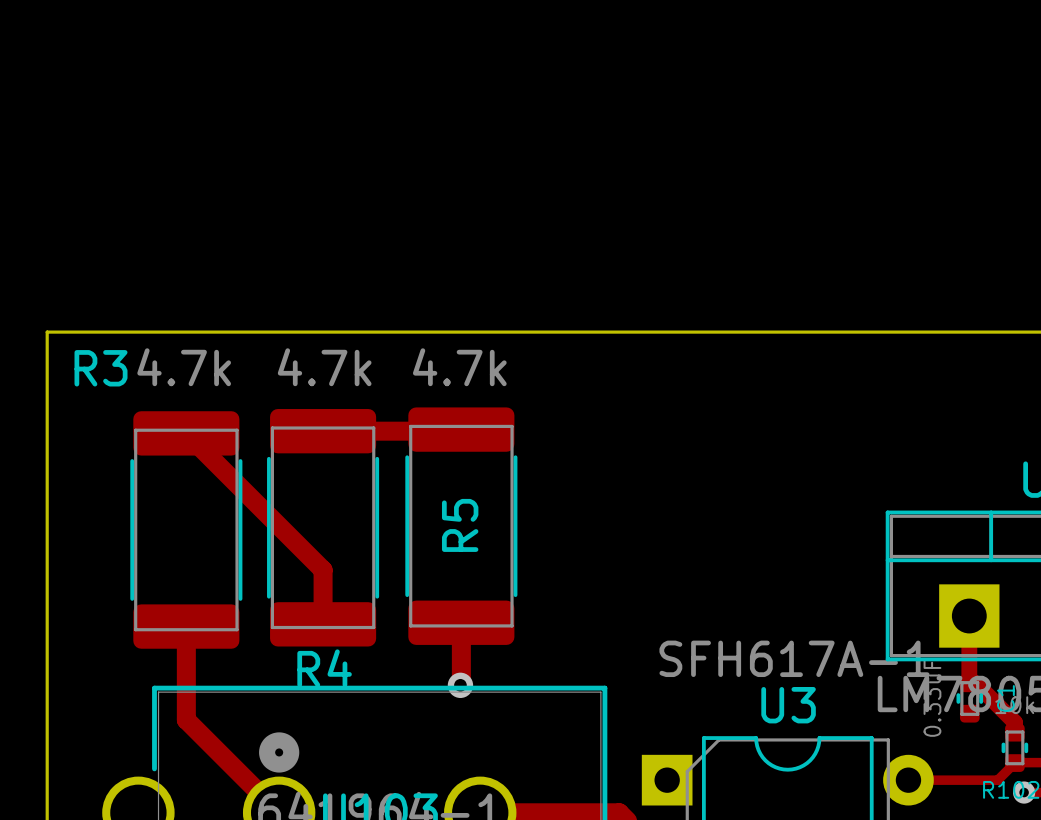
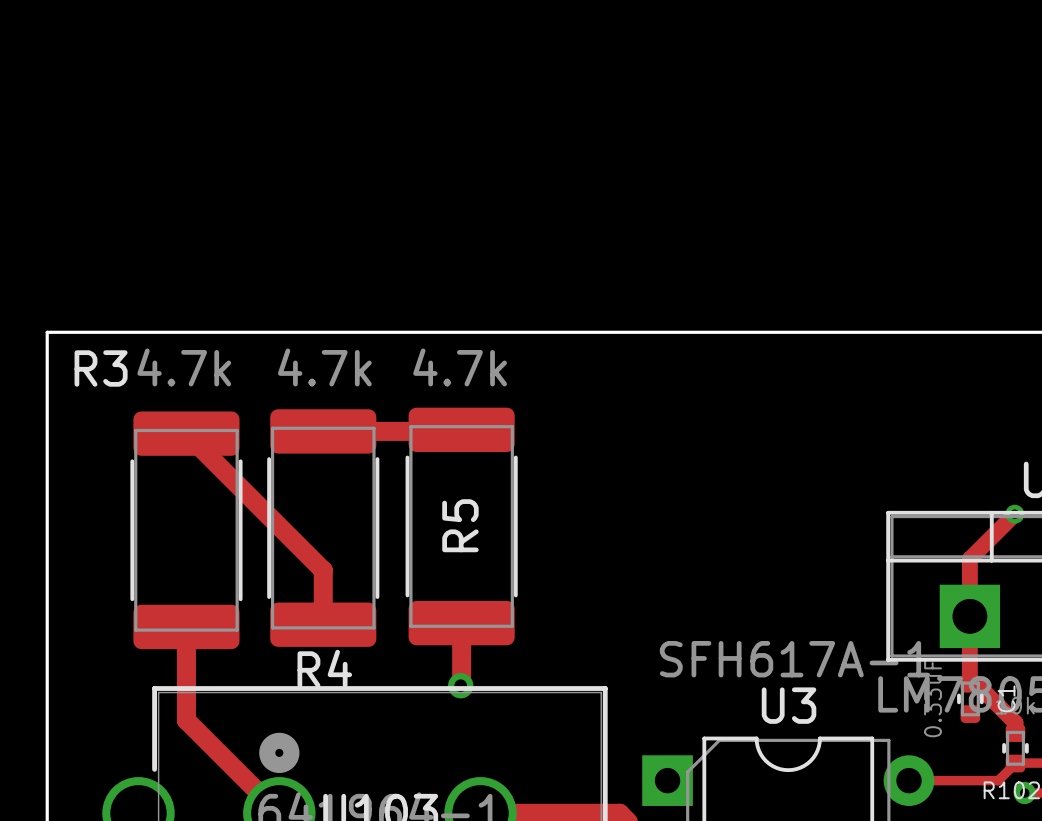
track: none -> (1014, 514) (969, 559) (969, 616)
via: none -> (1014, 514)

